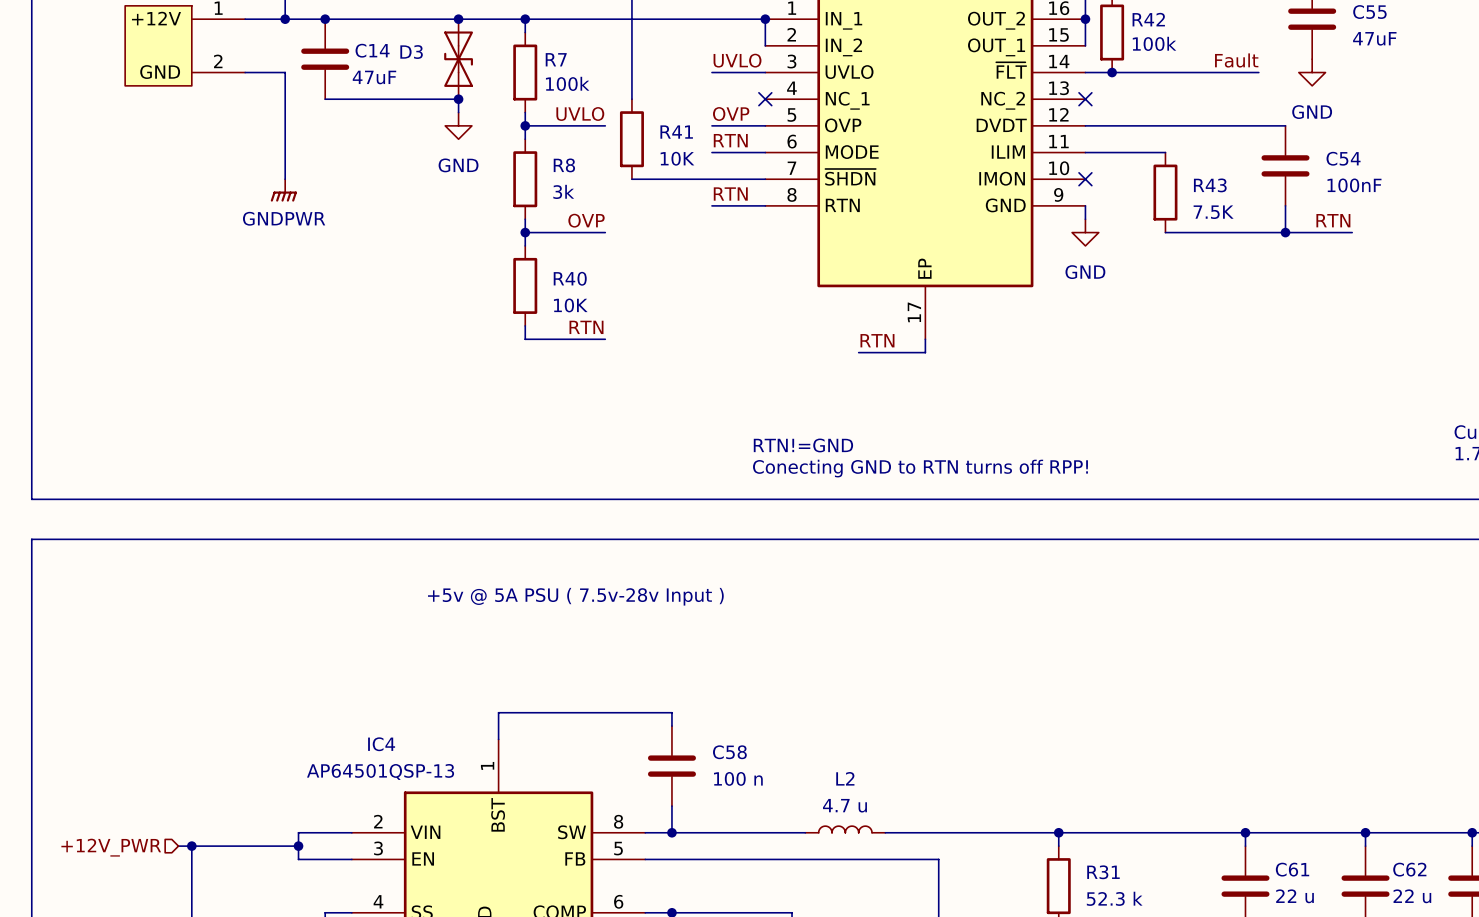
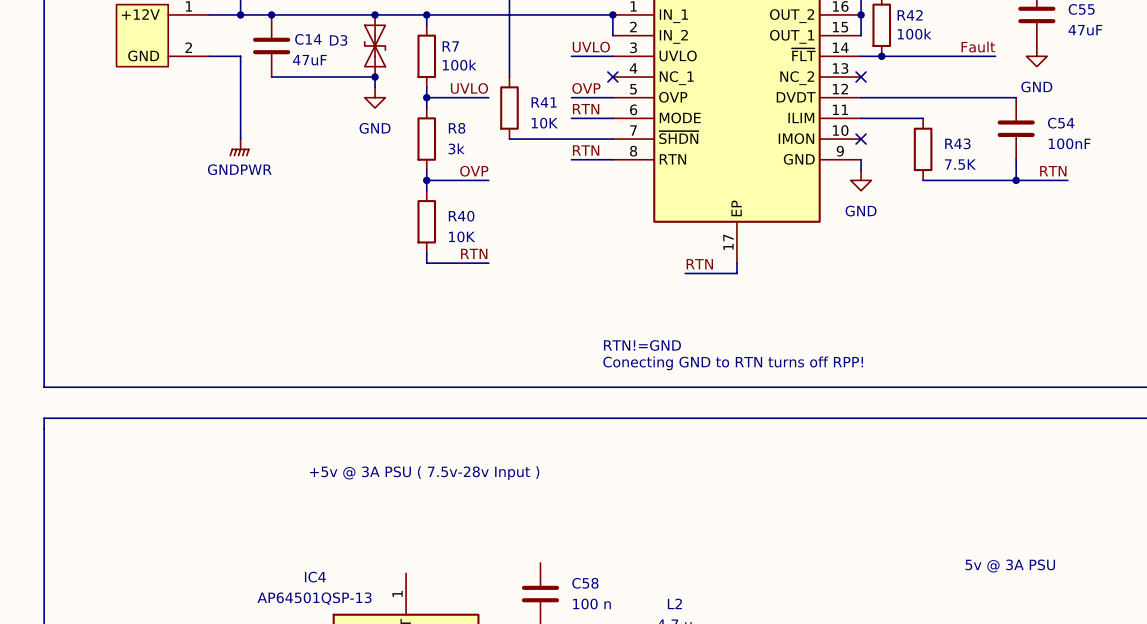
text: +5v @ 5A PSU ( 7.5v-28v Input ) (575, 596) -> +5v @ 3A PSU ( 7.5v-28v Input ) (424, 473)
wire: (671, 726) (671, 712) (498, 712) (498, 739) -> none
text: none -> 5v @ 3A PSU (1010, 566)

